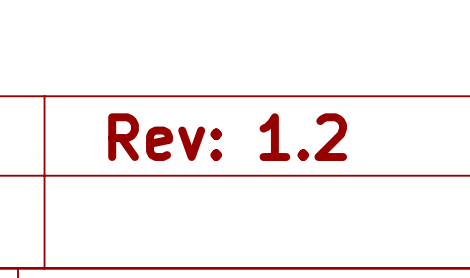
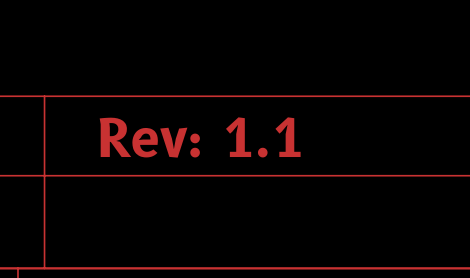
title block: Rev: 1.2 (227, 137) -> Rev: 1.1 (200, 137)

